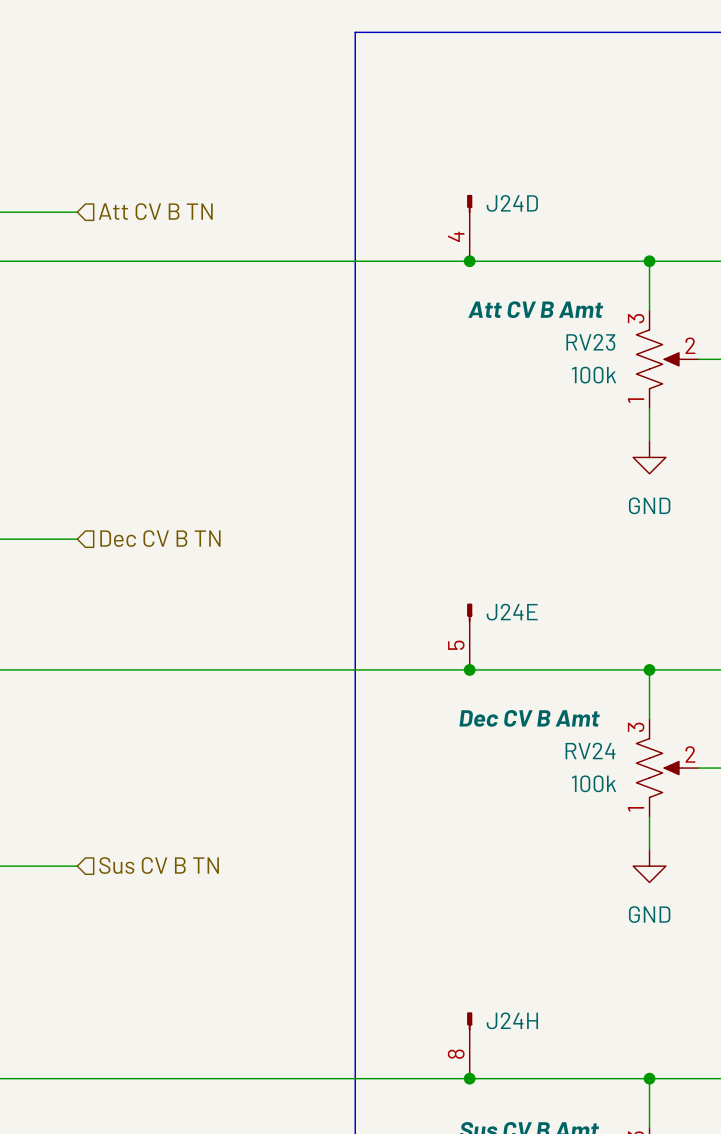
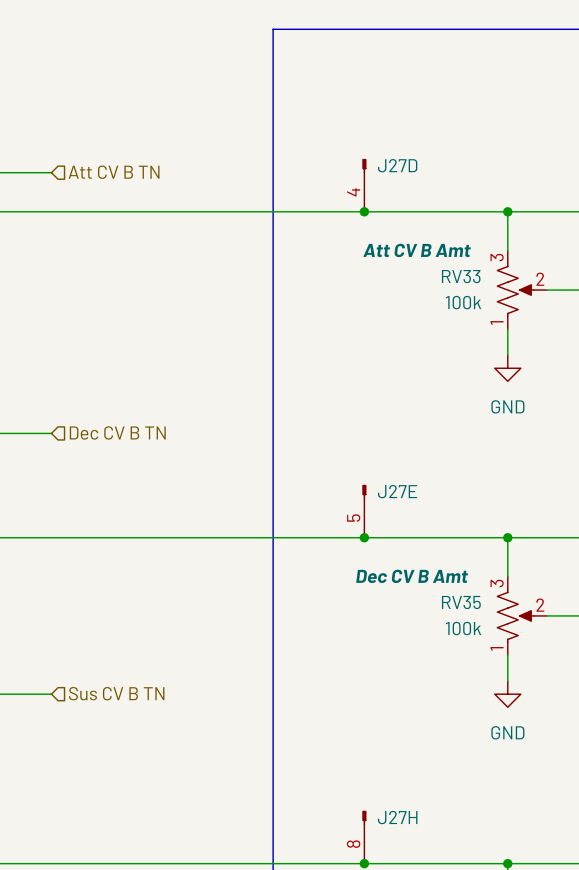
J24D name: J24D (512, 203) -> J27D (397, 165)
RV23 name: RV23 (590, 342) -> RV33 (461, 276)
J24E name: J24E (512, 612) -> J27E (397, 491)
RV24 name: RV24 (590, 750) -> RV35 (461, 602)
J24H name: J24H (512, 1020) -> J27H (397, 817)

